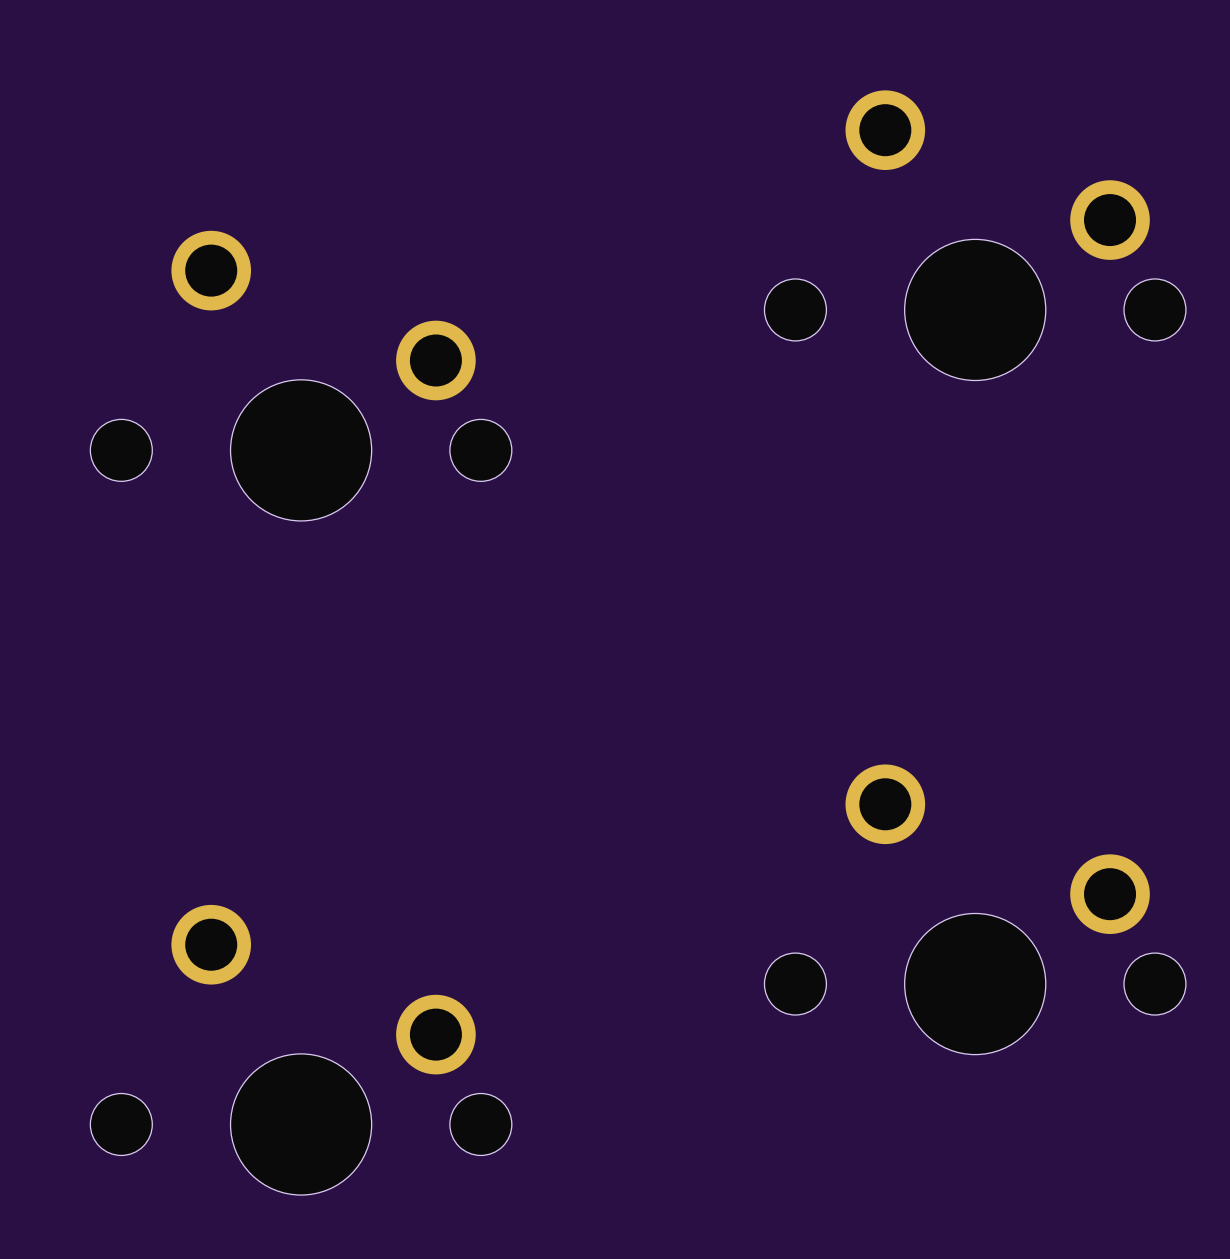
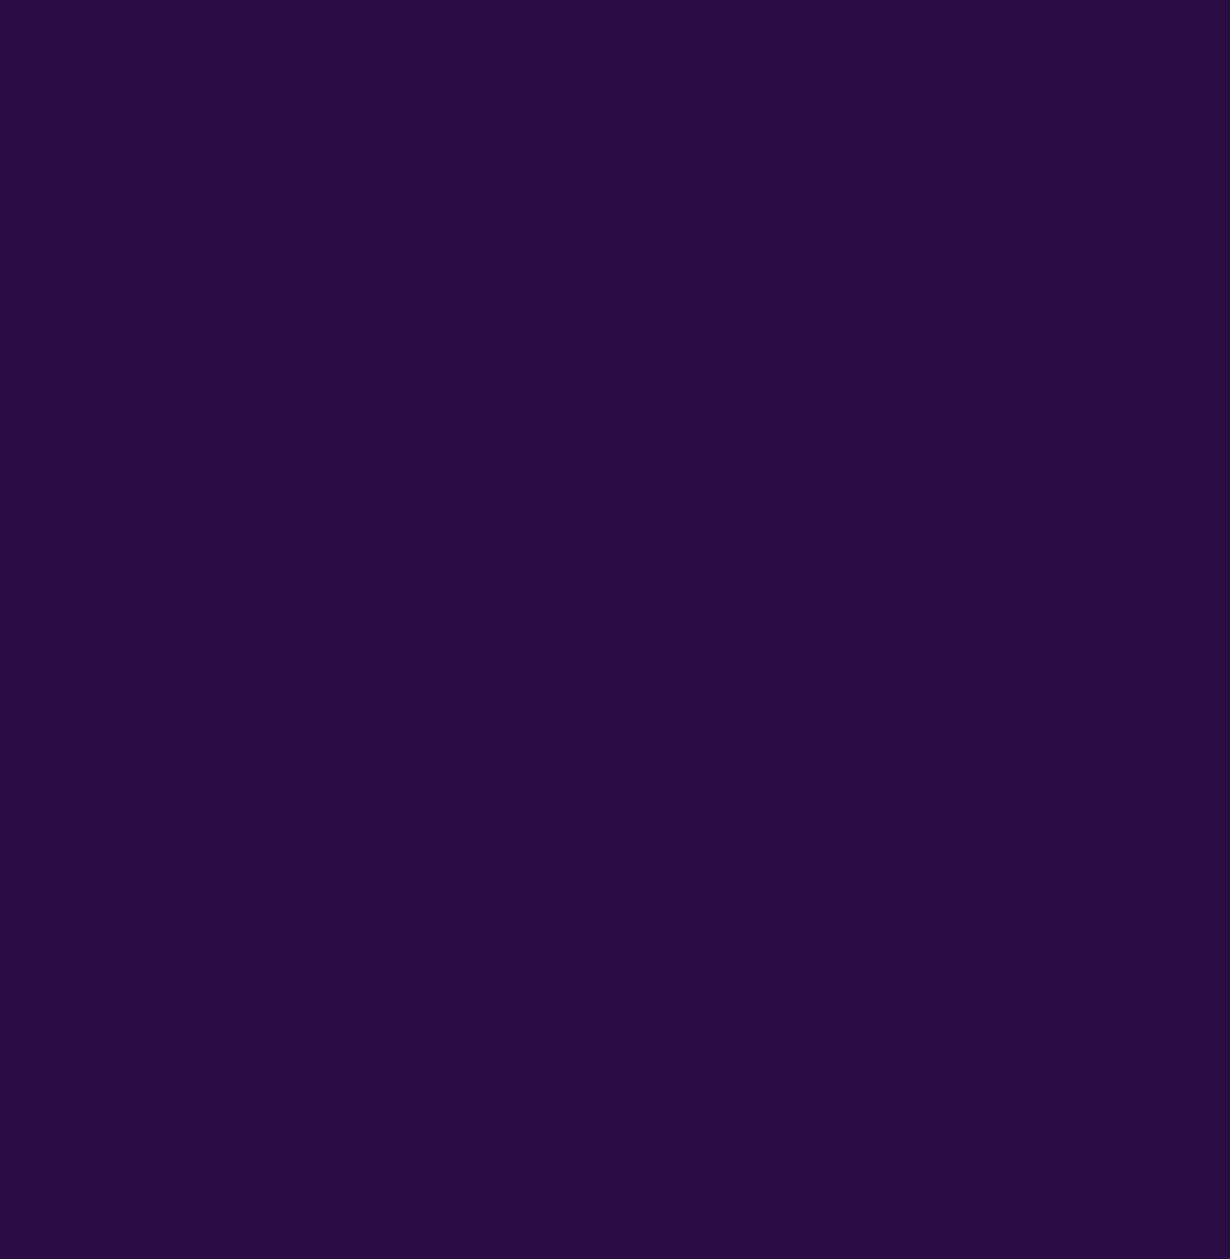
part: (975, 235) -> none
part: (301, 375) -> none
part: (975, 909) -> none
part: (301, 1049) -> none

